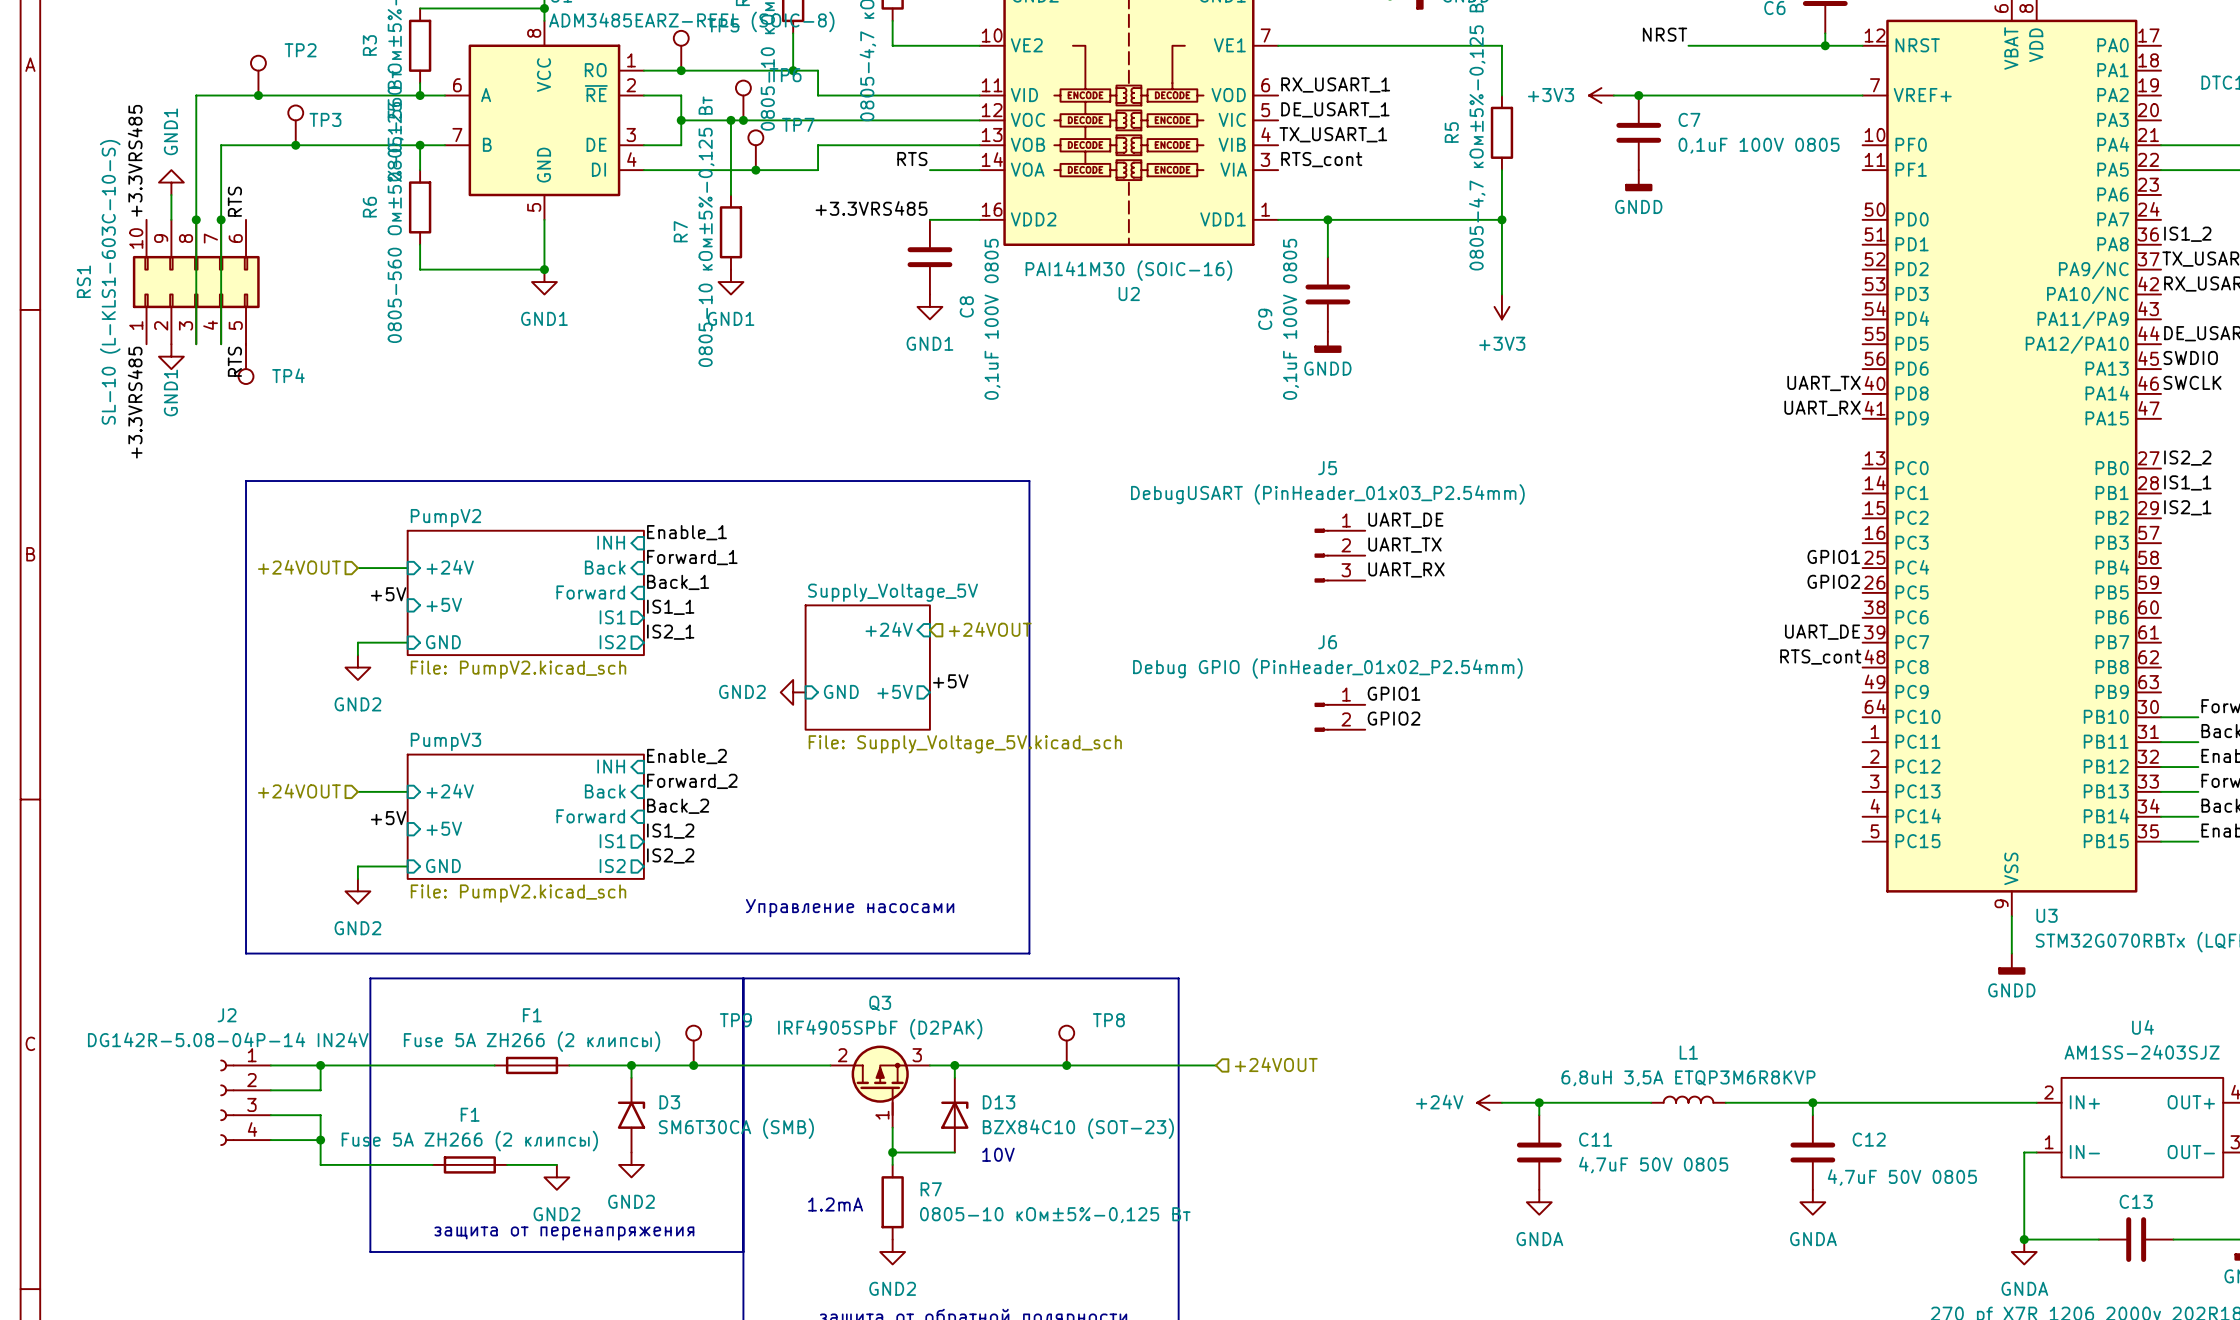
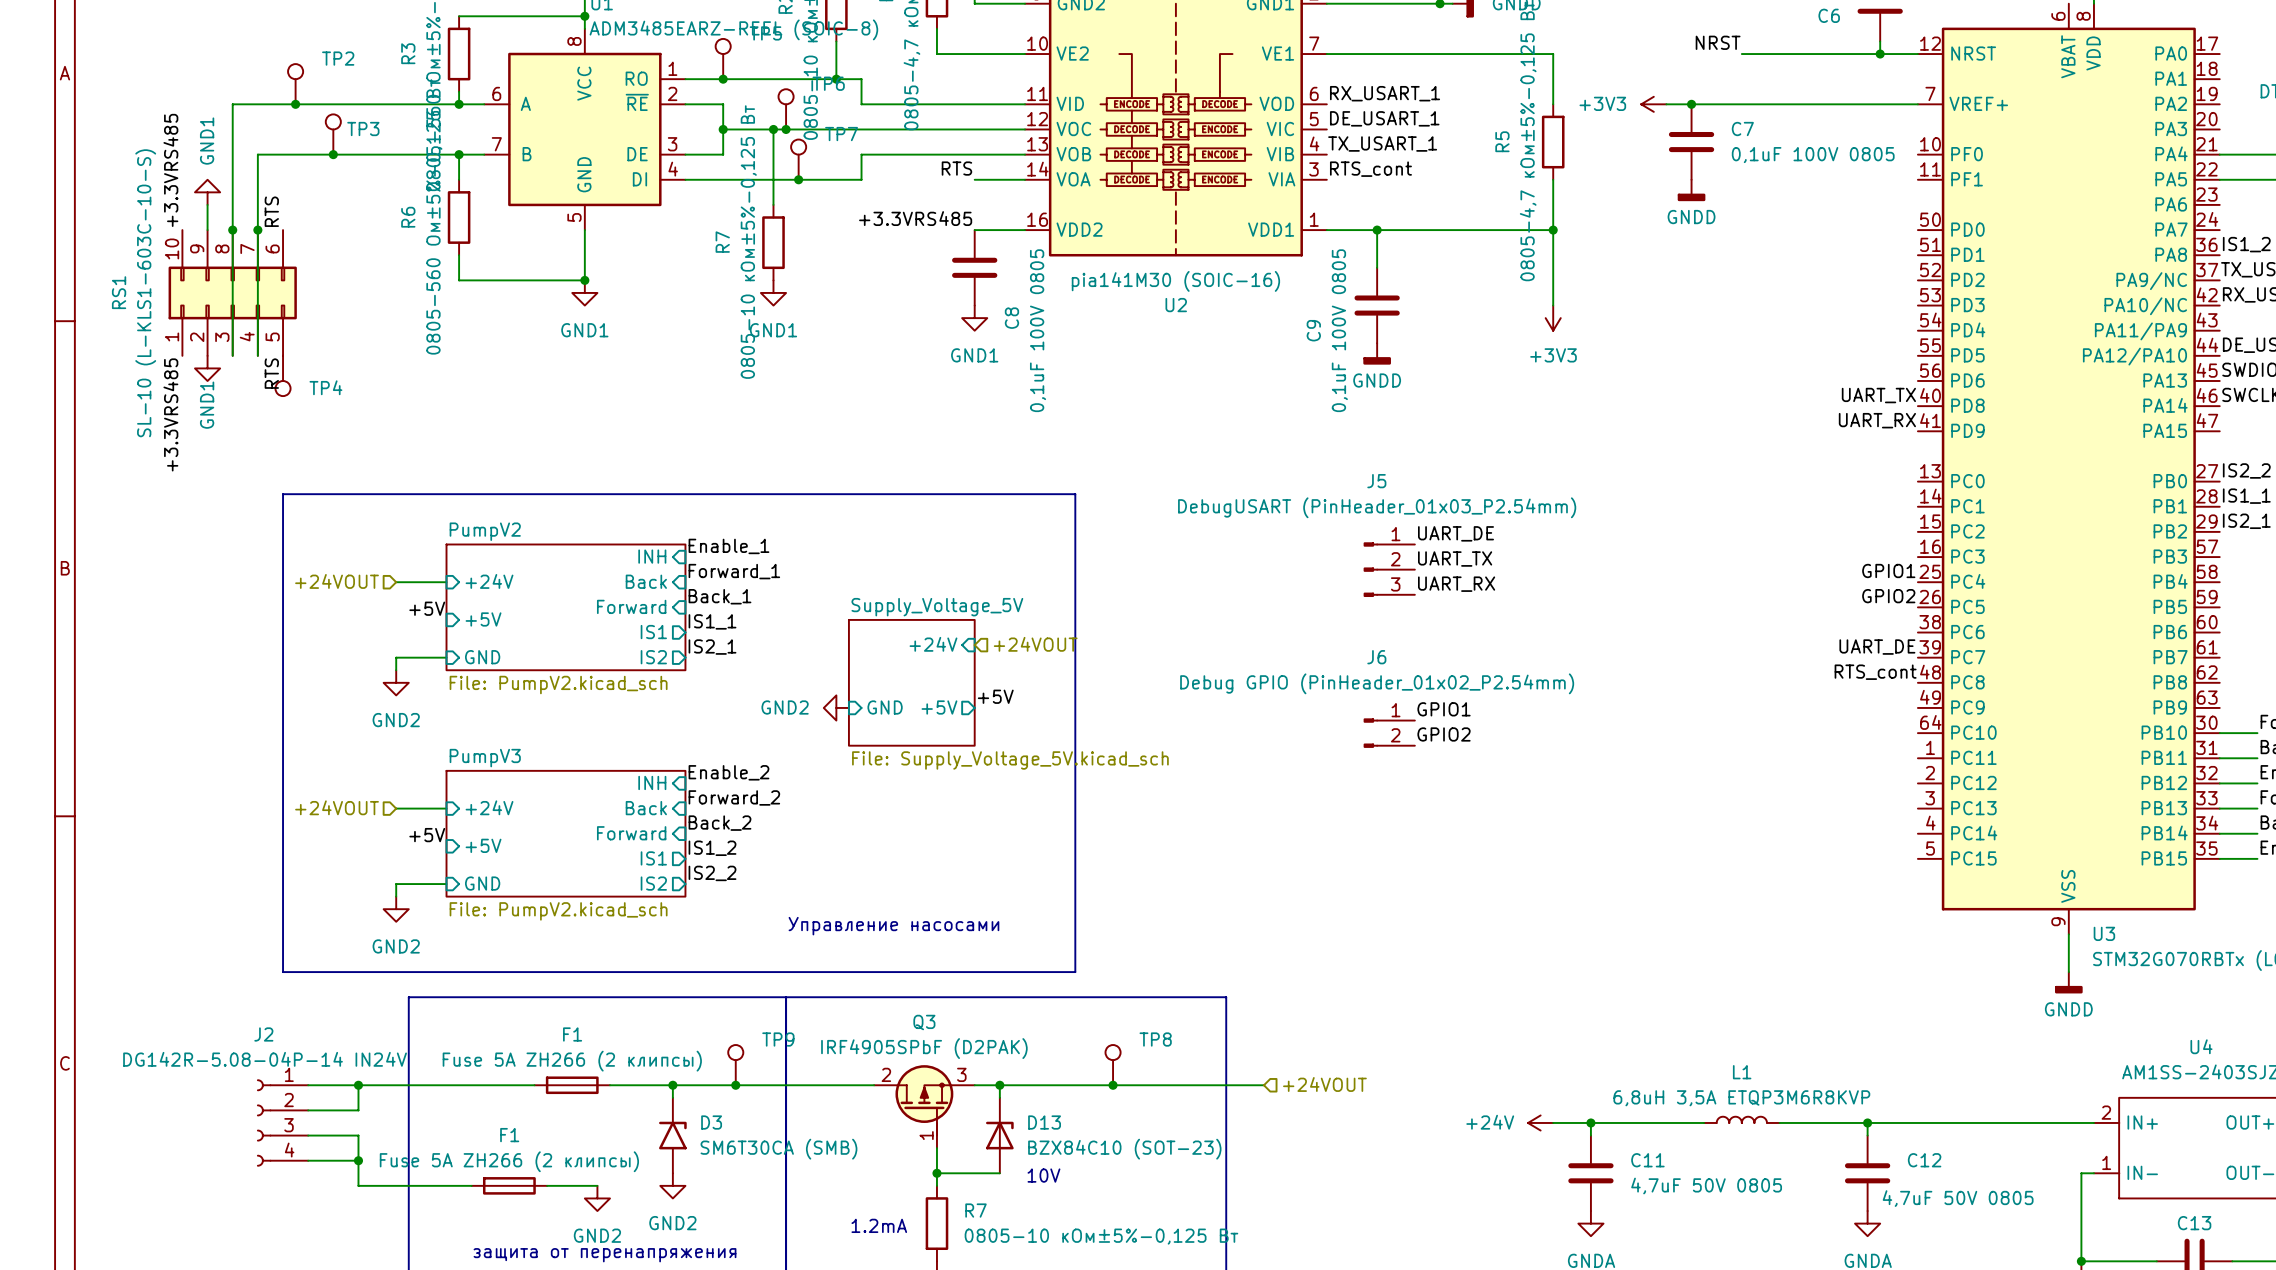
U2 value: PAI141M30 (SOIC-16) (1128, 270) -> pia141M30 (SOIC-16) (1175, 281)

